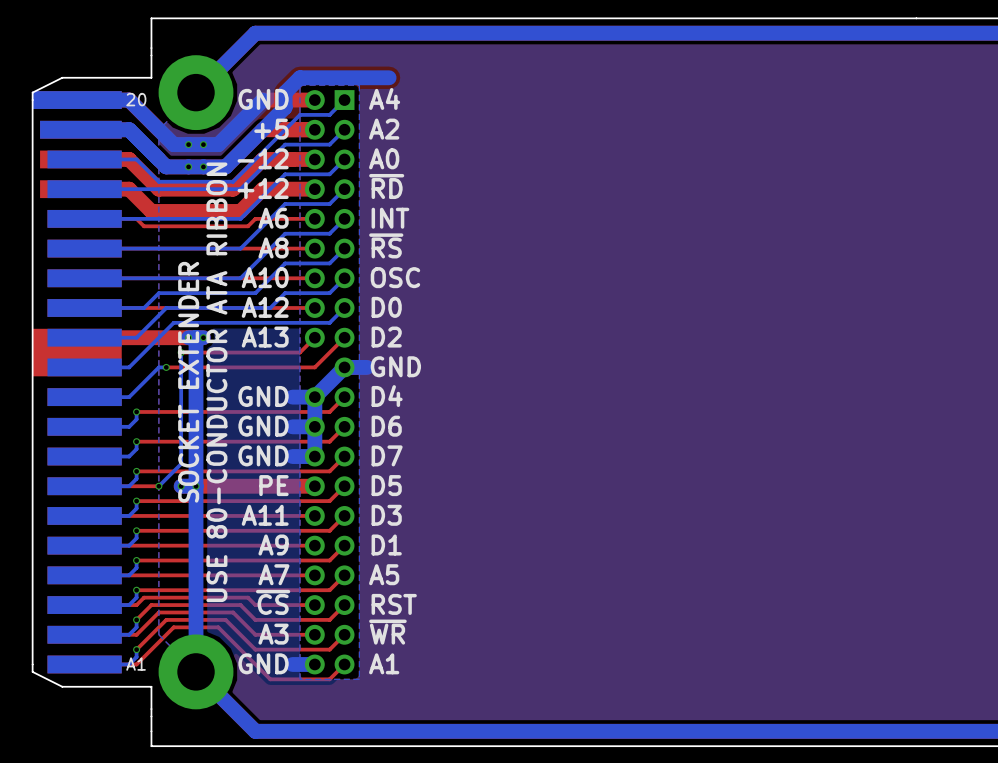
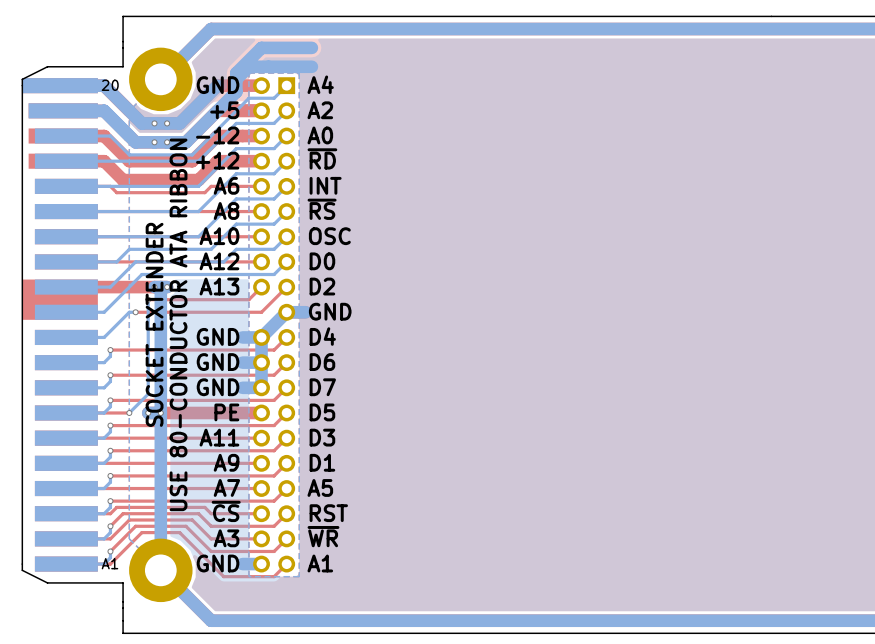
bottom track: none -> (311, 47) (261, 47) (236, 73) (236, 79)
bottom track: (389, 77) (374, 77) -> none

